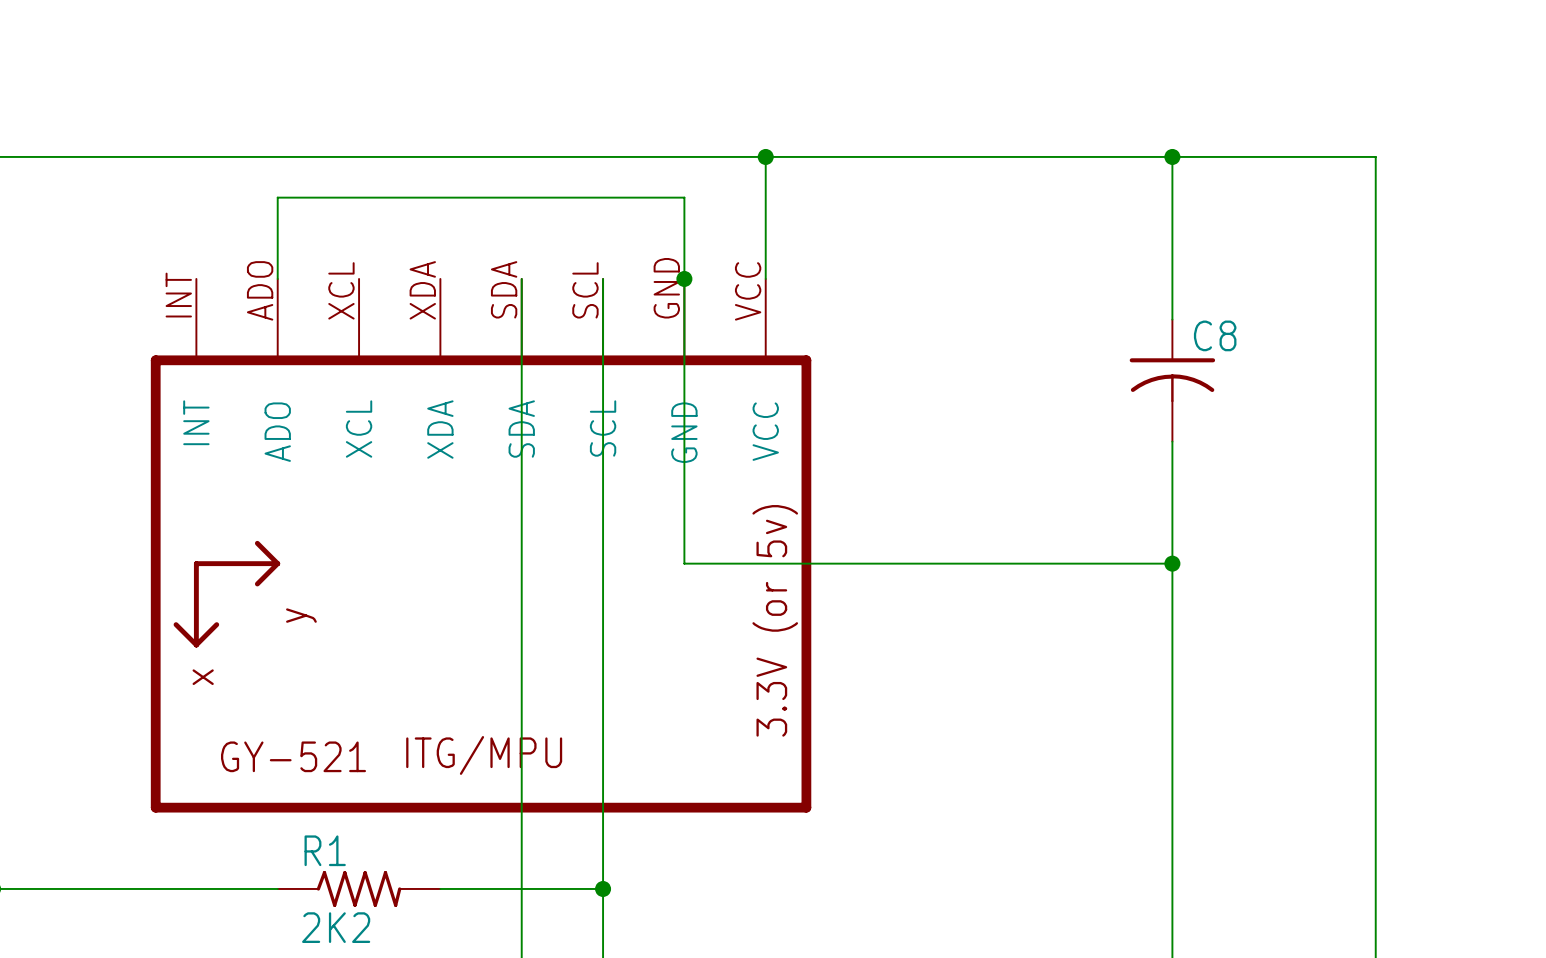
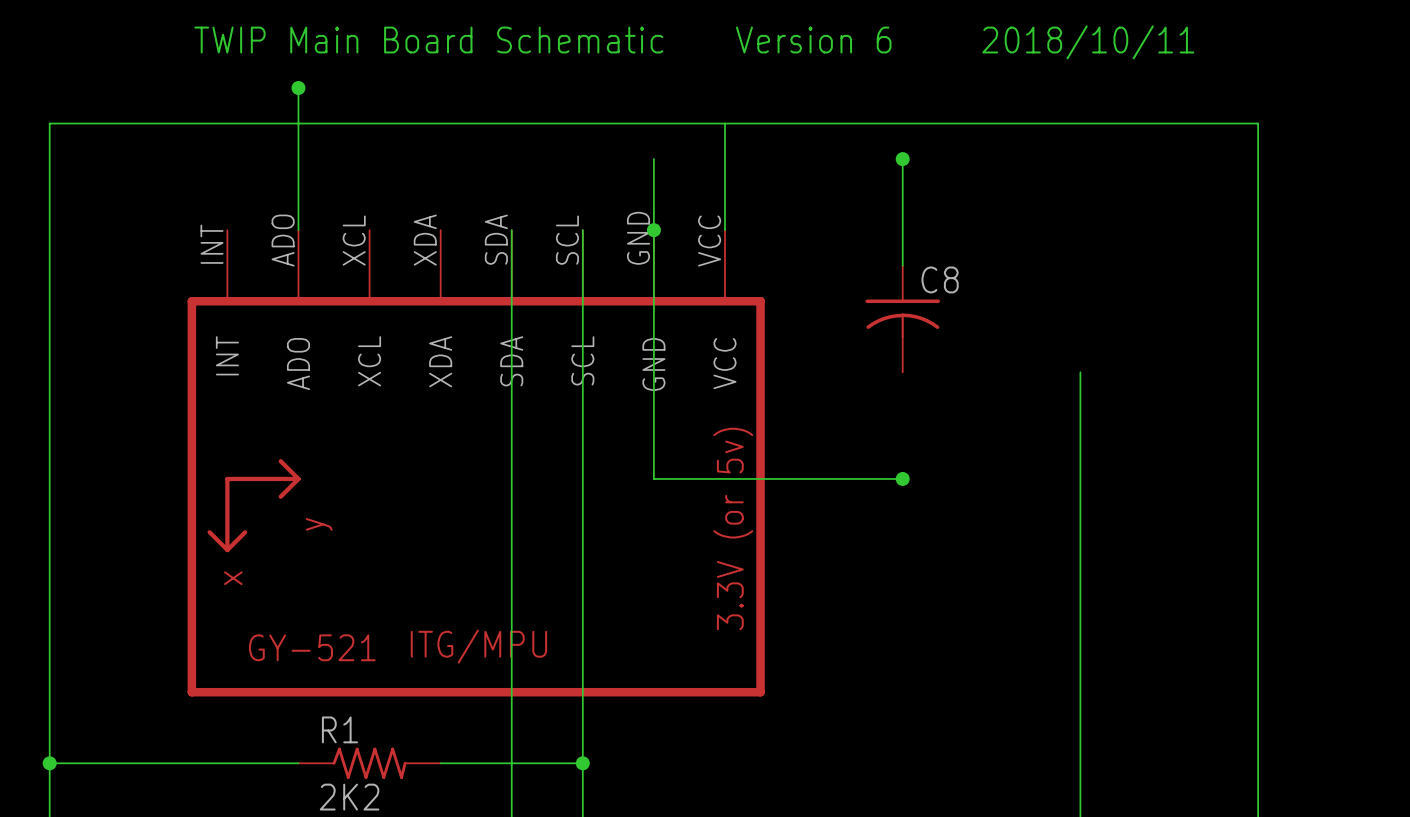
text: none -> TWIP Main Board Schematic Version 6 2018/10/11 (694, 42)
junction: none -> (298, 88)
junction: (765, 156) -> none
wire: (1172, 156) (1172, 319) -> none
junction: (1172, 156) -> none
wire: (277, 197) (684, 197) -> (298, 159) (298, 88)
wire: none -> (902, 159) (902, 265)
junction: none -> (902, 159)
C8 position: (1172, 380) -> (902, 319)
wire: (969, 563) (1172, 563) -> none
junction: none -> (902, 478)
junction: (1172, 563) -> none

